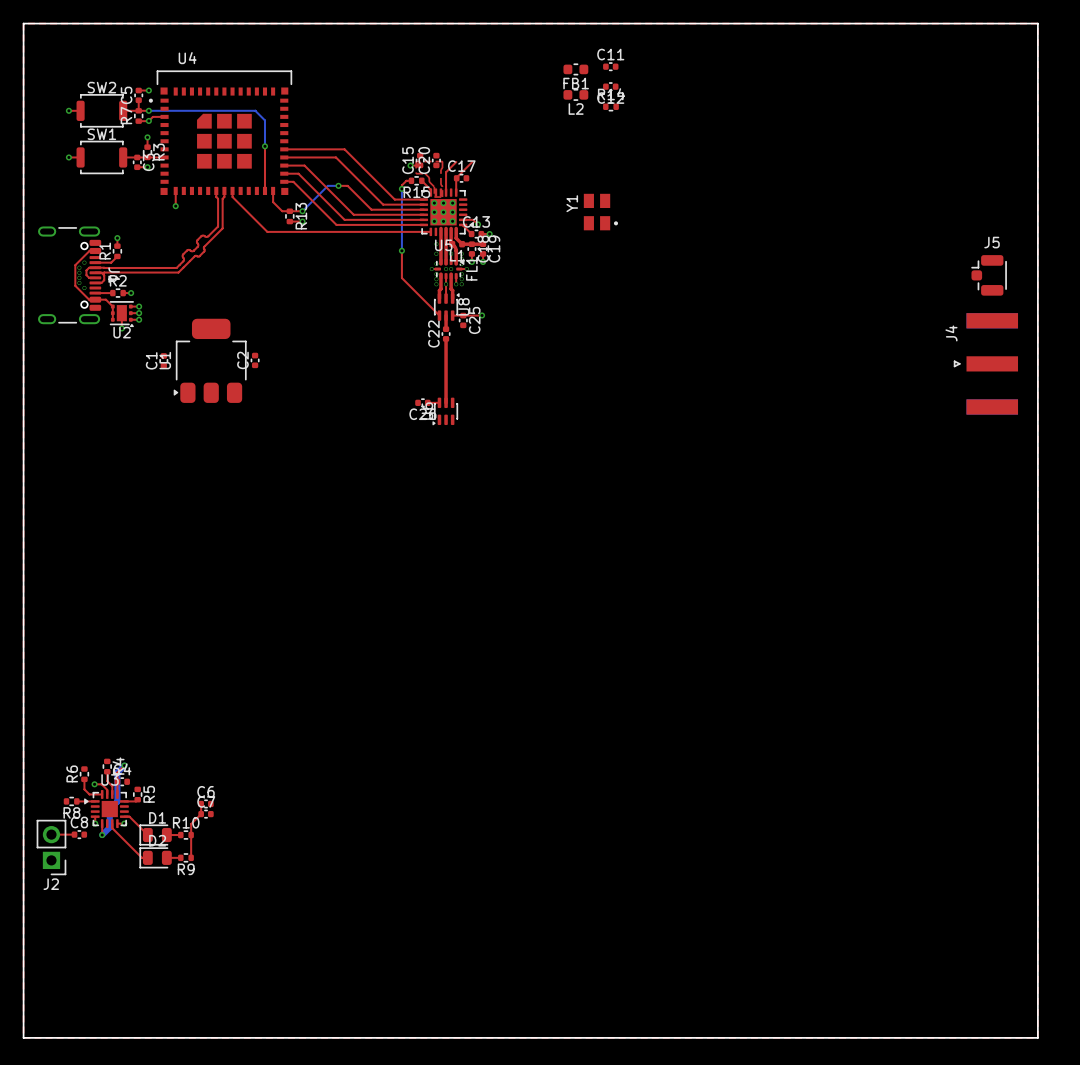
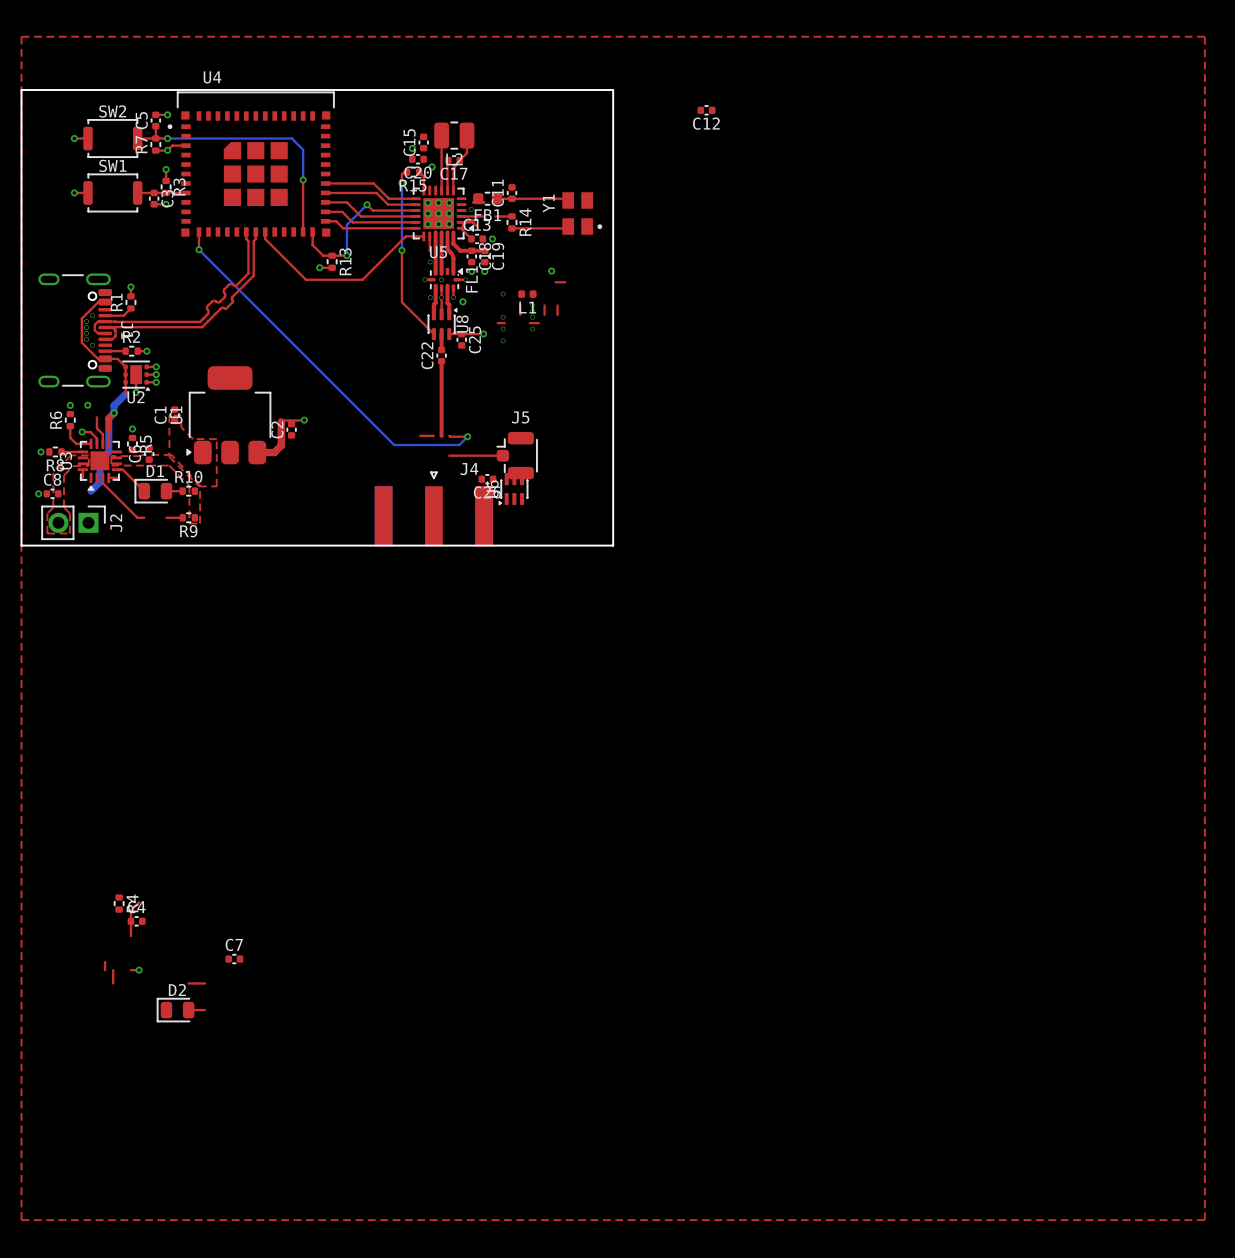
C11 rotation: 0° (610, 66) -> 90° clockwise (512, 193)
C11 position: (610, 66) -> (512, 193)
board edge: (23, 69) (23, 23) (1037, 23) (1037, 1037) (23, 1037) (23, 459) -> (21, 89) (613, 89) (613, 545) (21, 545)
FB1 position: (575, 69) -> (487, 198)
L2 footprint: [563, 89, 589, 101] -> [434, 121, 475, 150]
R14 rotation: 0° (610, 106) -> 90° clockwise (512, 222)
R14 position: (610, 106) -> (512, 222)
top track: none -> (441, 135) (441, 190)
top track: none -> (467, 135) (467, 153) (453, 168) (453, 190)
via: none -> (412, 148)
top track: none -> (448, 160) (447, 190)
via: none -> (432, 166)
top track: none -> (407, 172) (401, 174) (401, 183)
top track: none -> (419, 172) (423, 176) (423, 190)
top track: (325, 149) (344, 149) (394, 199) (423, 199) -> (373, 183) (388, 198) (415, 198)
bottom track: none -> (401, 183) (401, 250)
via: none -> (401, 183)
top track: (327, 157) (335, 157) (383, 204) (423, 204) -> (376, 192) (388, 204) (415, 204)
C15 position: (420, 160) -> (423, 142)
C20 rotation: 0° (436, 160) -> 90° clockwise (417, 159)
C20 position: (436, 160) -> (417, 159)
top zone outline: (416, 161) (416, 173) (425, 173) (434, 186) (434, 197) (442, 197) (440, 184) (442, 161) (416, 161) -> none
top track: none -> (496, 198) (566, 198) (568, 200)
top track: (456, 162) (446, 172) (446, 192) -> none
top track: (472, 162) (456, 178) (456, 192) -> none
top track: (302, 165) (353, 214) (423, 214) -> (346, 202) (360, 216) (415, 216)
via: none -> (427, 202)
via: none -> (438, 202)
via: none -> (449, 202)
via: (410, 165) -> none
C17 name position: C17 (461, 166) -> C17 (453, 173)
top track: none -> (367, 204) (372, 210) (415, 210)
via: none -> (367, 204)
via: none -> (471, 209)
via: none -> (427, 213)
via: none -> (438, 213)
via: none -> (449, 213)
top track: none -> (461, 216) (484, 216)
top track: none -> (495, 216) (511, 216)
C17 position: (461, 178) -> (454, 160)
R15 position: (416, 180) -> (413, 172)
top track: (421, 180) (430, 189) (430, 192) -> none
top track: (307, 182) (344, 219) (423, 219) -> (352, 222) (415, 222)
via: none -> (427, 224)
via: none -> (438, 224)
via: none -> (449, 224)
top track: (338, 185) (347, 185) (371, 209) (423, 209) -> none
bottom track: (338, 185) (327, 185) (302, 211) -> (367, 204) (346, 224) (346, 255)
via: (338, 185) -> none
top track: none -> (568, 226) (566, 228) (509, 228)
top track: (299, 187) (336, 224) (423, 224) -> (343, 228) (415, 228)
bottom track: (401, 188) (401, 250) -> none
via: (401, 188) -> none
top track: none -> (429, 236) (430, 250)
via: none -> (492, 238)
via: (434, 203) -> none
via: (443, 203) -> none
via: (452, 203) -> none
bottom track: none -> (199, 249) (394, 445) (459, 445) (467, 436)
top track: none -> (401, 250) (401, 302) (433, 334)
via: none -> (401, 250)
via: (434, 212) -> none
via: (443, 212) -> none
U5 position: (446, 212) -> (442, 213)
via: (452, 212) -> none
Y1 position: (600, 212) -> (582, 213)
via: none -> (430, 262)
top track: (463, 219) (473, 219) (476, 223) -> (461, 222) (473, 222) (477, 226)
top track: (289, 221) (302, 221) -> (332, 267) (319, 267)
via position: (302, 221) -> (319, 267)
via: (434, 221) -> none
via: (443, 221) -> none
via: (452, 221) -> none
via: none -> (471, 271)
via: none -> (484, 271)
top track: (463, 224) (471, 234) -> (461, 228) (471, 238)
top track: (440, 228) (440, 263) -> (435, 232) (435, 273)
top track: (446, 228) (446, 263) -> (441, 232) (441, 273)
top track: (451, 228) (451, 242) (455, 249) (456, 263) -> (447, 232) (447, 248) (453, 256) (453, 273)
top track: (456, 228) (456, 238) (462, 244) (483, 244) -> (453, 232) (453, 243) (460, 250) (484, 250)
top track: (315, 231) (369, 231) -> (362, 279) (405, 236) (423, 236)
via: none -> (425, 279)
top track: (375, 231) (396, 231) -> none
via: none -> (441, 279)
top track: (404, 231) (430, 231) -> none
via: none -> (465, 279)
C13 position: (476, 234) -> (477, 238)
via: (489, 234) -> none
via: none -> (430, 297)
via: none -> (441, 297)
via: none -> (453, 297)
C18 position: (471, 249) -> (471, 256)
C19 position: (483, 249) -> (484, 256)
top track: (401, 250) (401, 278) (439, 315) -> none
via: (436, 253) -> none
via: (451, 253) -> none
via: (471, 261) -> none
via: (483, 261) -> none
via: (431, 269) -> none
via: (446, 269) -> none
FL1 position: (449, 269) -> (445, 279)
via: (451, 269) -> none
via: (466, 269) -> none
top track: (440, 274) (439, 298) -> (435, 285) (433, 314)
top track: (451, 274) (452, 298) -> (447, 285) (449, 314)
J5 position: (989, 275) -> (517, 455)
top track: (446, 276) (446, 298) -> (441, 288) (441, 314)
top track: (456, 276) (456, 284) -> (453, 288) (453, 297)
via: none -> (483, 333)
via: (436, 279) -> none
via: (461, 279) -> none
via: (446, 284) -> none
via: (456, 284) -> none
via: (461, 284) -> none
U8 position: (446, 306) -> (442, 324)
top track: (446, 315) (446, 329) -> (441, 334) (441, 349)
top track: (452, 315) (481, 315) -> (449, 334) (483, 334)
via: (482, 315) -> none
top track: none -> (125, 382) (125, 394)
C25 position: (463, 320) -> (461, 339)
bottom track: none -> (125, 394) (114, 405) (114, 413) (108, 418) (108, 452) (99, 460) (99, 482) (91, 491)
C22 position: (446, 334) -> (441, 355)
top track: (446, 338) (446, 402) -> (441, 361) (441, 435)
via: none -> (70, 405)
via: none -> (87, 405)
top track: none -> (114, 413) (108, 418) (108, 443)
via: none -> (114, 413)
top zone outline: none -> (169, 415) (169, 456) (199, 486) (216, 486) (216, 439) (193, 439) (181, 427) (181, 415) (169, 415)
top track: none -> (96, 417) (96, 428) (102, 434) (102, 443)
top track: none -> (304, 420) (281, 420)
via: none -> (304, 420)
top track: none -> (281, 421) (281, 445) (274, 452) (257, 452)
top track: none -> (70, 426) (70, 437) (76, 443) (91, 443)
via: none -> (132, 429)
C1 position: (163, 360) -> (174, 415)
U1 position: (210, 360) -> (228, 415)
top track: none -> (82, 431) (90, 431) (96, 438) (96, 443)
via: none -> (82, 431)
J4 rotation: 0° (986, 363) -> 90° clockwise (433, 508)
J4 position: (986, 363) -> (433, 508)
top track: none -> (449, 435) (467, 436)
via: none -> (467, 436)
via: none -> (41, 451)
top track: none -> (61, 451) (82, 451)
top zone outline: none -> (71, 455) (88, 455) (88, 466) (73, 466) (63, 475) (63, 507) (69, 513) (69, 533) (47, 533) (47, 513) (53, 507) (53, 473) (71, 455)
top zone outline: none -> (142, 454) (171, 454) (200, 485) (200, 523) (189, 523) (189, 485) (169, 465) (111, 465) (111, 456) (142, 454)
top track: none -> (449, 455) (502, 455)
top track: none -> (82, 469) (82, 477)
top track: none -> (116, 469) (122, 469) (144, 491)
top track: none -> (102, 477) (102, 483) (137, 517) (144, 517)
top track: none -> (108, 477) (116, 477)
top track: (427, 402) (439, 402) -> (420, 435) (433, 435)
top track: none -> (166, 491) (182, 491)
via: none -> (38, 493)
top track: none -> (166, 517) (182, 517)
bottom track: (124, 765) (117, 772) (117, 801) (109, 809) (109, 827) (102, 835) -> none
via: (124, 765) -> none
top track: (107, 771) (107, 781) (112, 786) (112, 794) -> none
R6 position: (84, 774) -> (70, 420)
top track: (84, 779) (84, 789) (89, 794) (102, 794) -> none
top track: (94, 784) (101, 784) (107, 789) (107, 794) -> none
via: (94, 784) -> none
R5 position: (137, 794) -> (132, 443)
top track: (137, 799) (124, 801) -> none
R8 position: (71, 801) -> (55, 451)
top track: (76, 801) (95, 801) -> none
top track: (201, 803) (201, 814) (191, 824) (191, 857) -> none
C6 rotation: 0° (206, 803) -> 90° clockwise (149, 453)
C6 position: (206, 803) -> (149, 453)
U3 rotation: 0° (106, 809) -> 90° counterclockwise (99, 464)
U3 position: (106, 809) -> (99, 464)
top track: (124, 816) (129, 816) (147, 835) -> none
via: (95, 823) -> none
top track: (112, 823) (112, 828) (141, 857) (147, 857) -> none
top track: (51, 834) (74, 834) -> none
C8 position: (79, 834) -> (52, 493)
via: (102, 835) -> none
D1 position: (155, 835) -> (153, 491)
R10 position: (185, 835) -> (188, 491)
J2 rotation: 0° (51, 847) -> 90° counterclockwise (73, 522)
J2 position: (51, 847) -> (73, 522)
R9 position: (185, 857) -> (188, 517)

